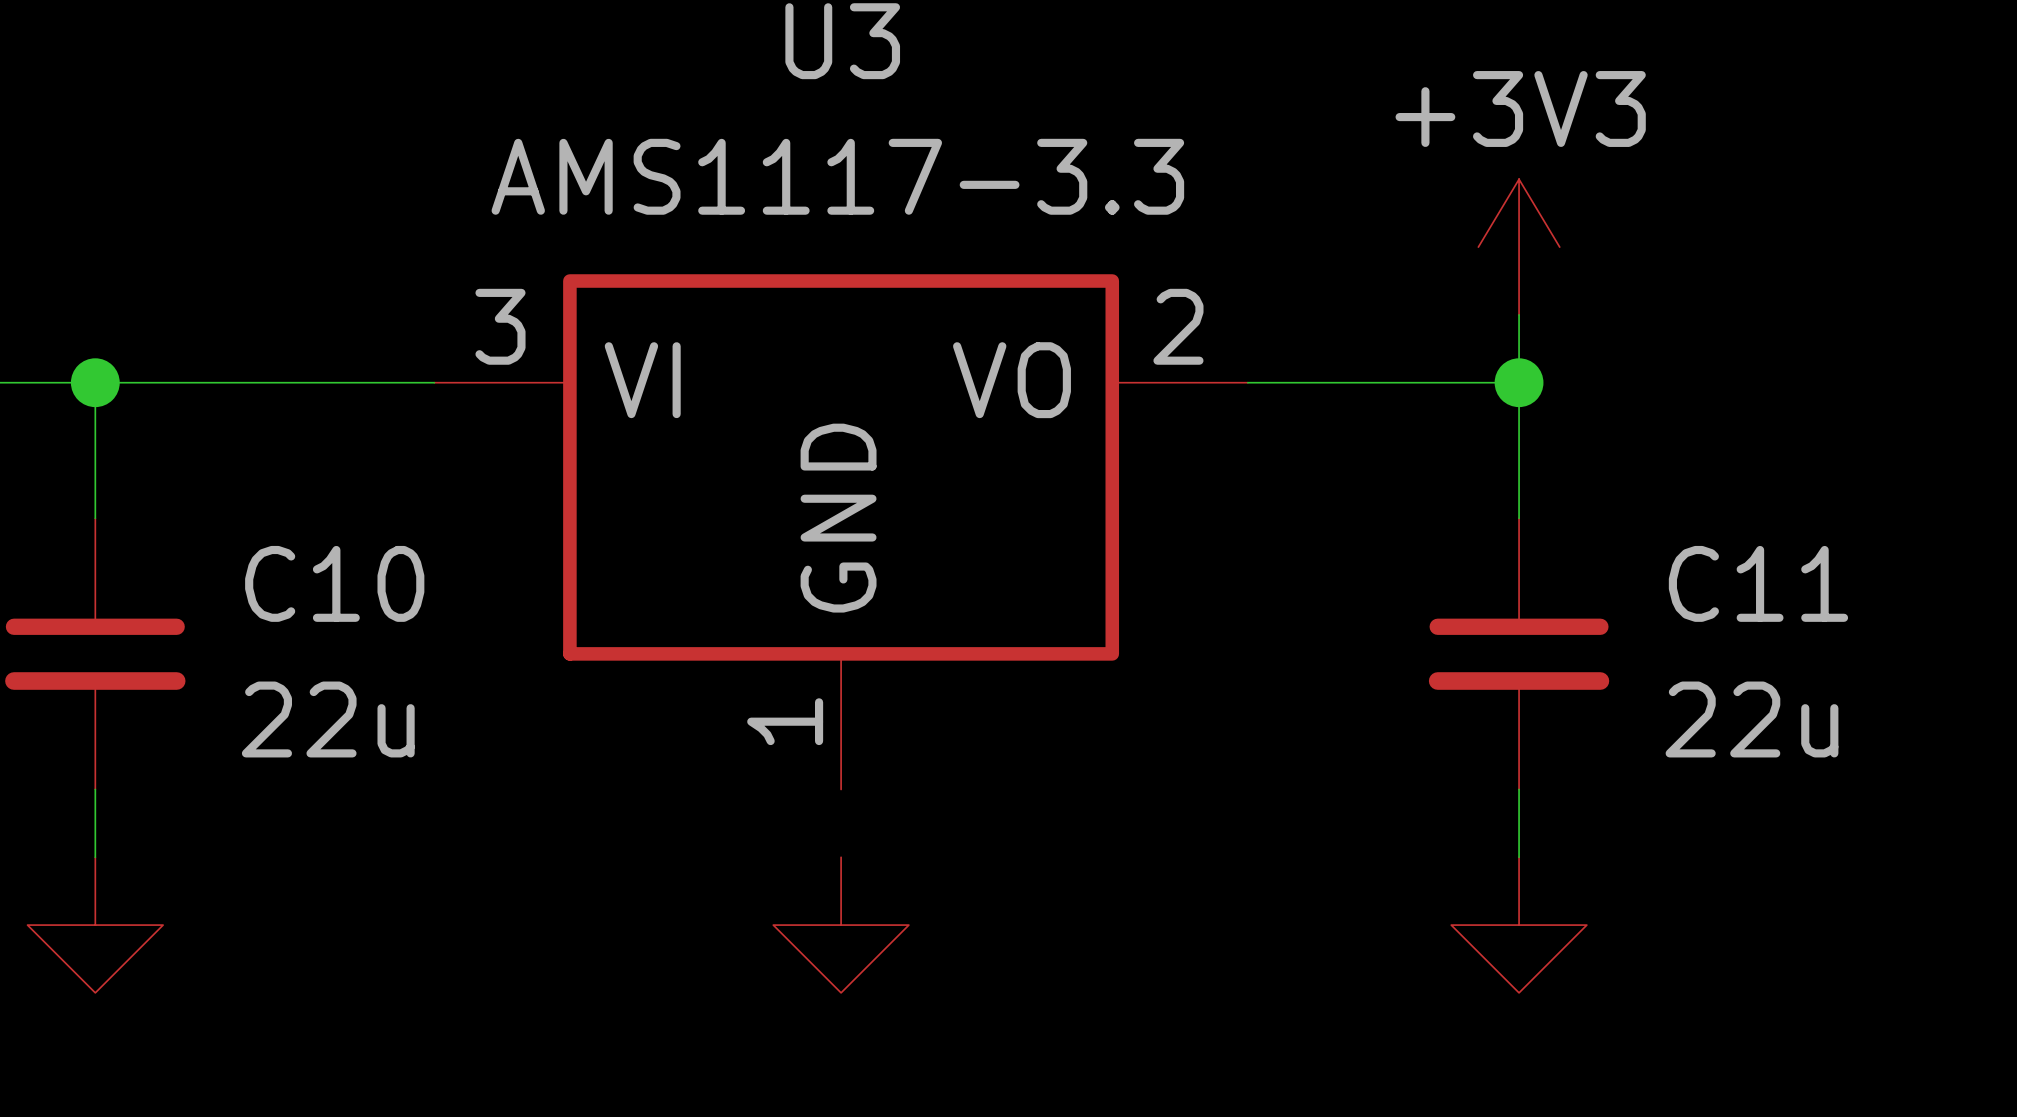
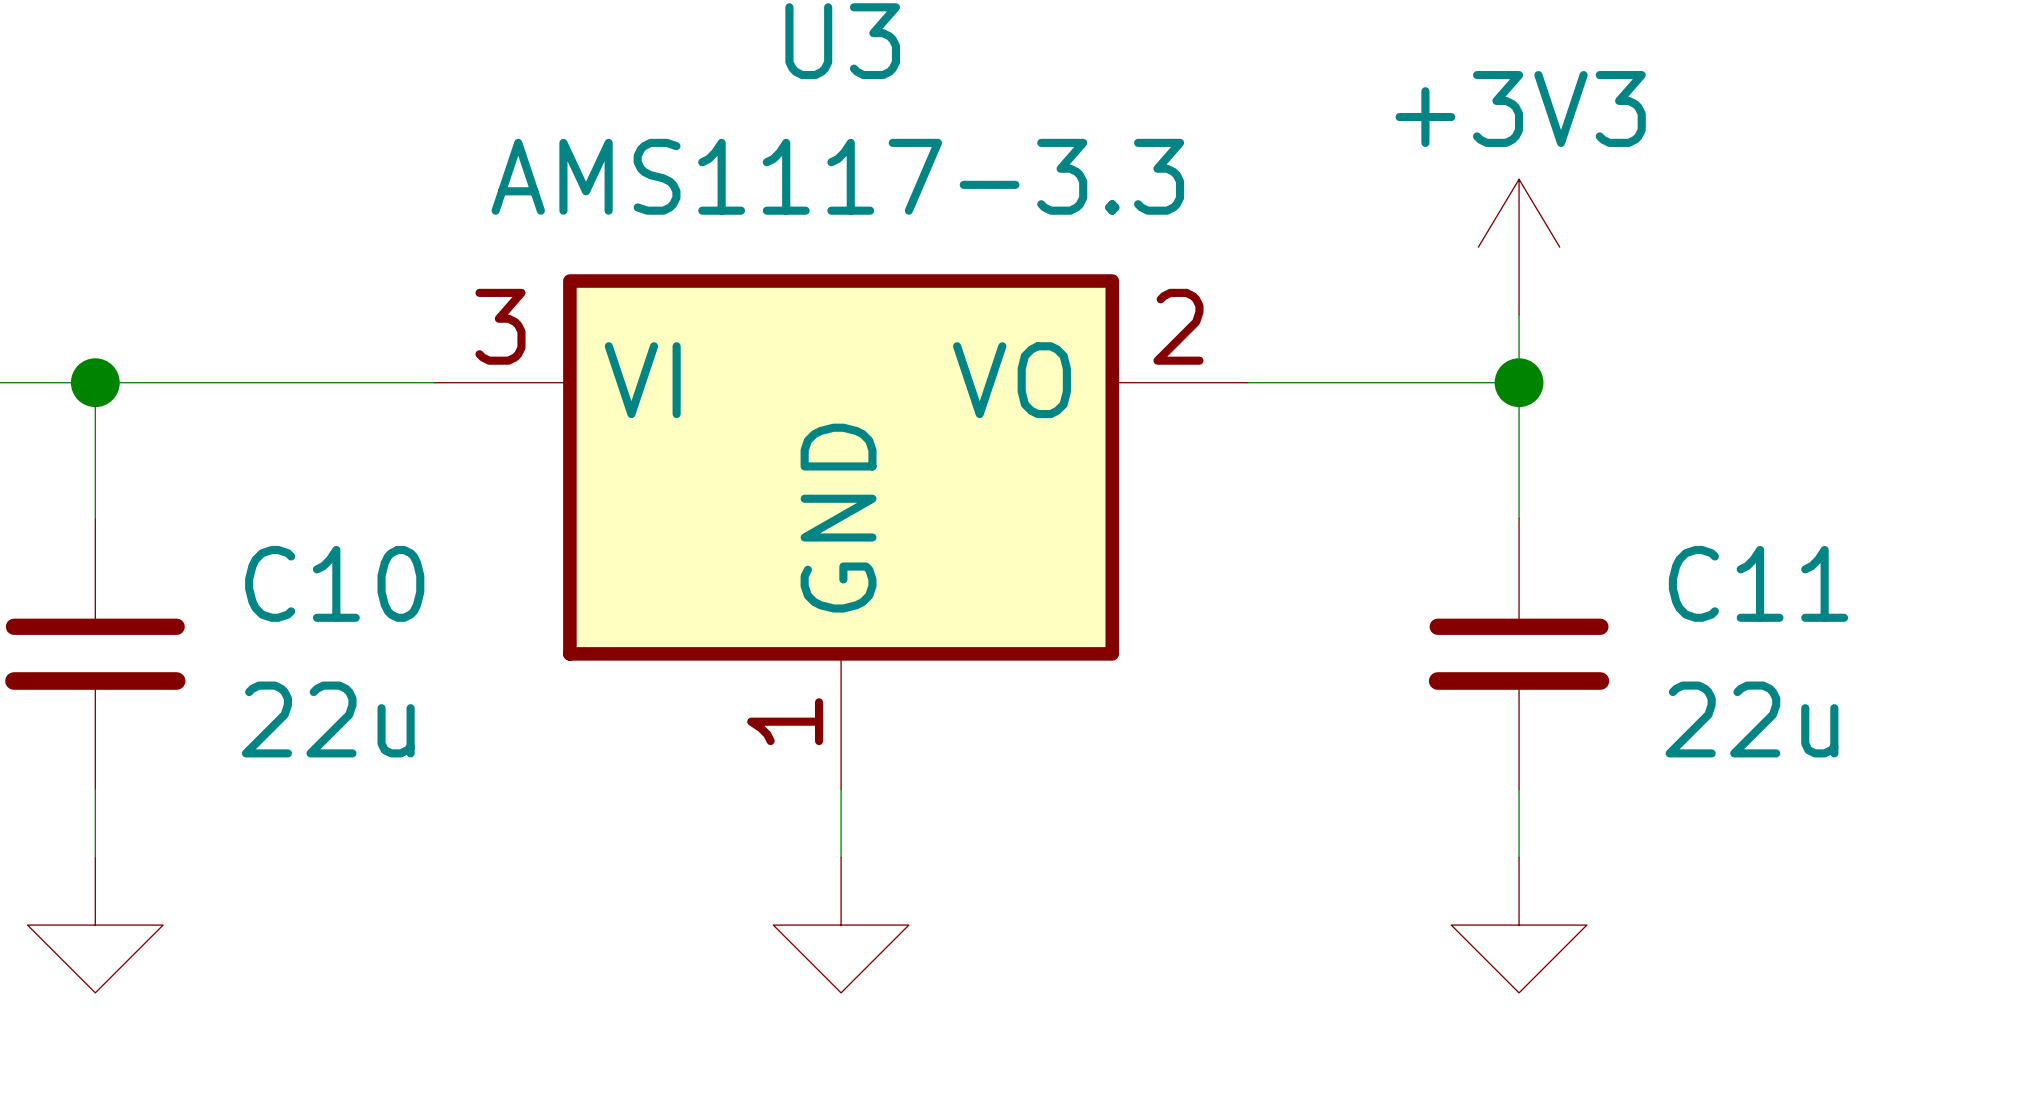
wire: none -> (841, 789) (841, 857)

